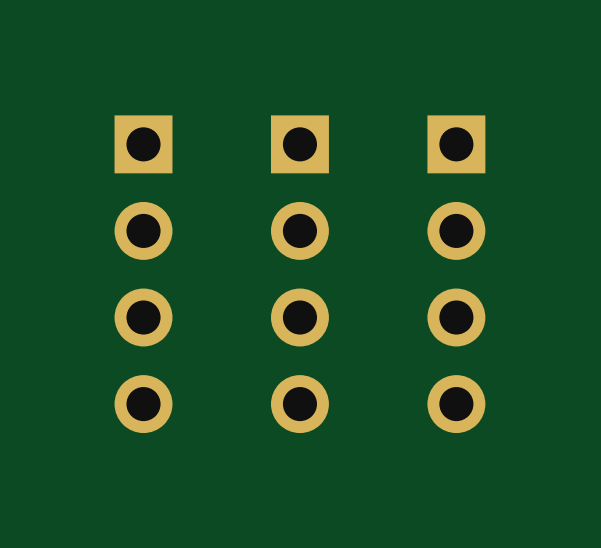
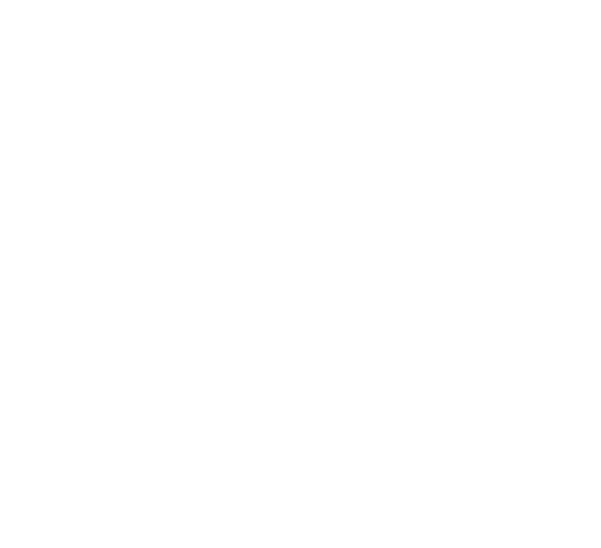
part: (143, 274) -> none
part: (299, 274) -> none
part: (456, 274) -> none

